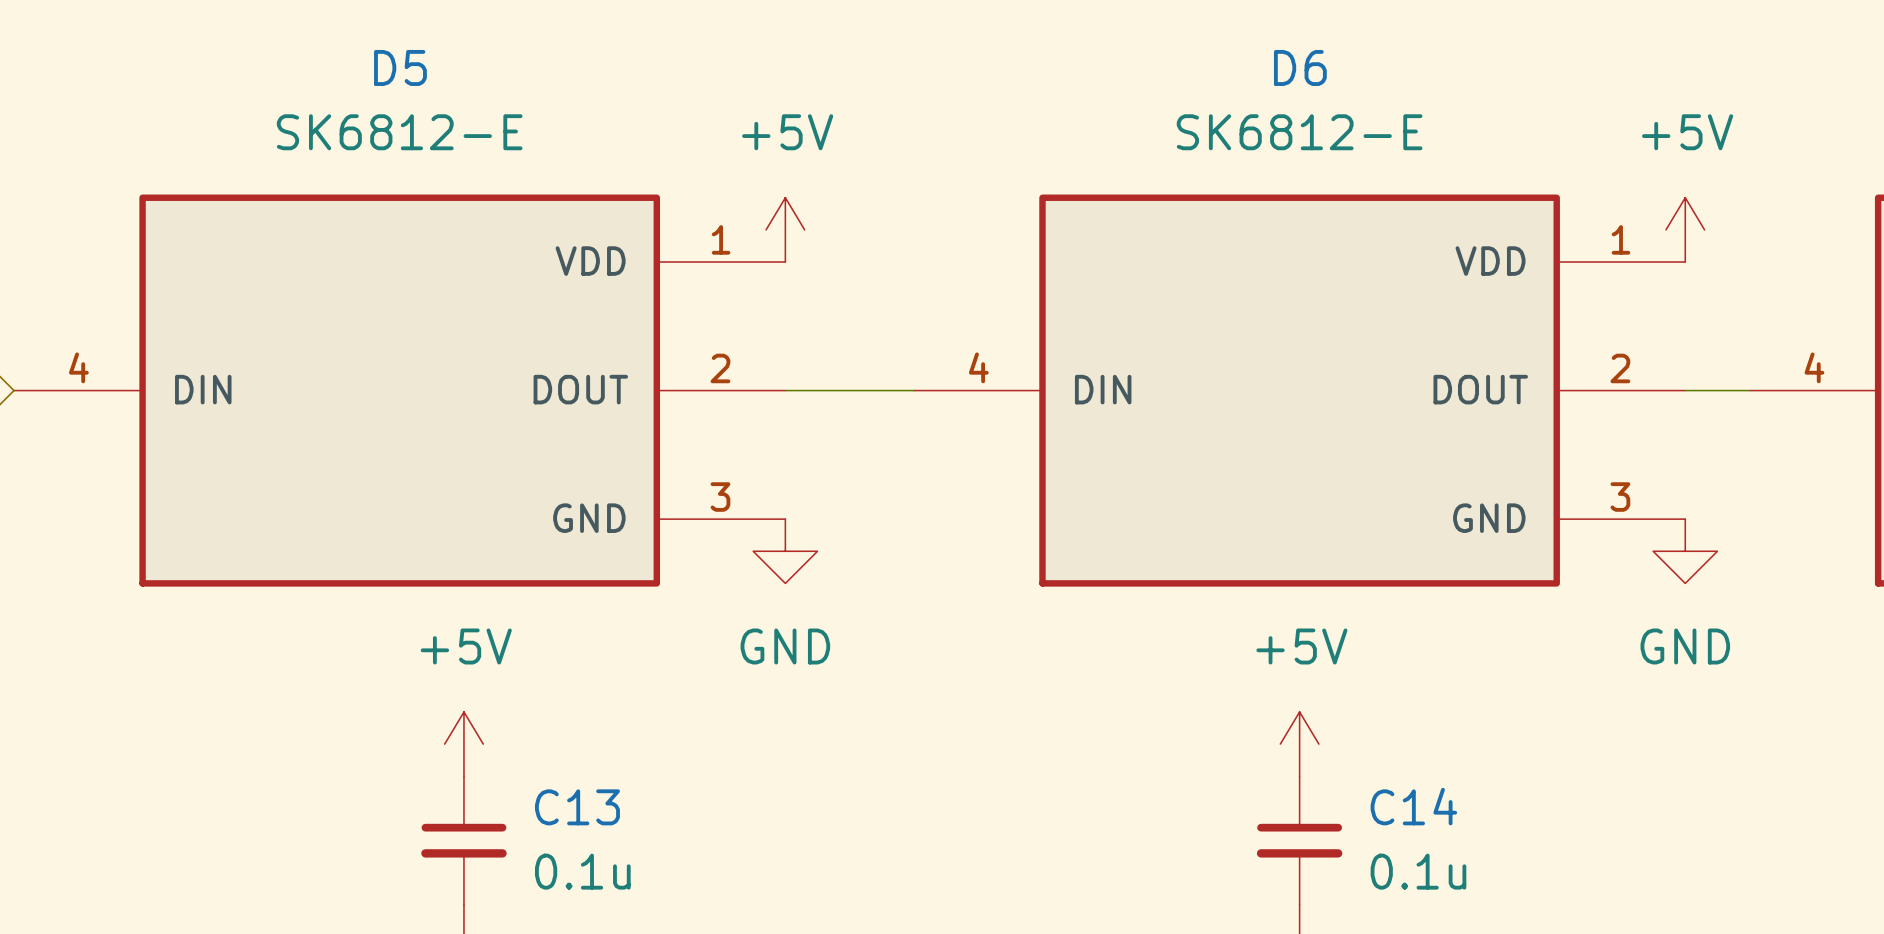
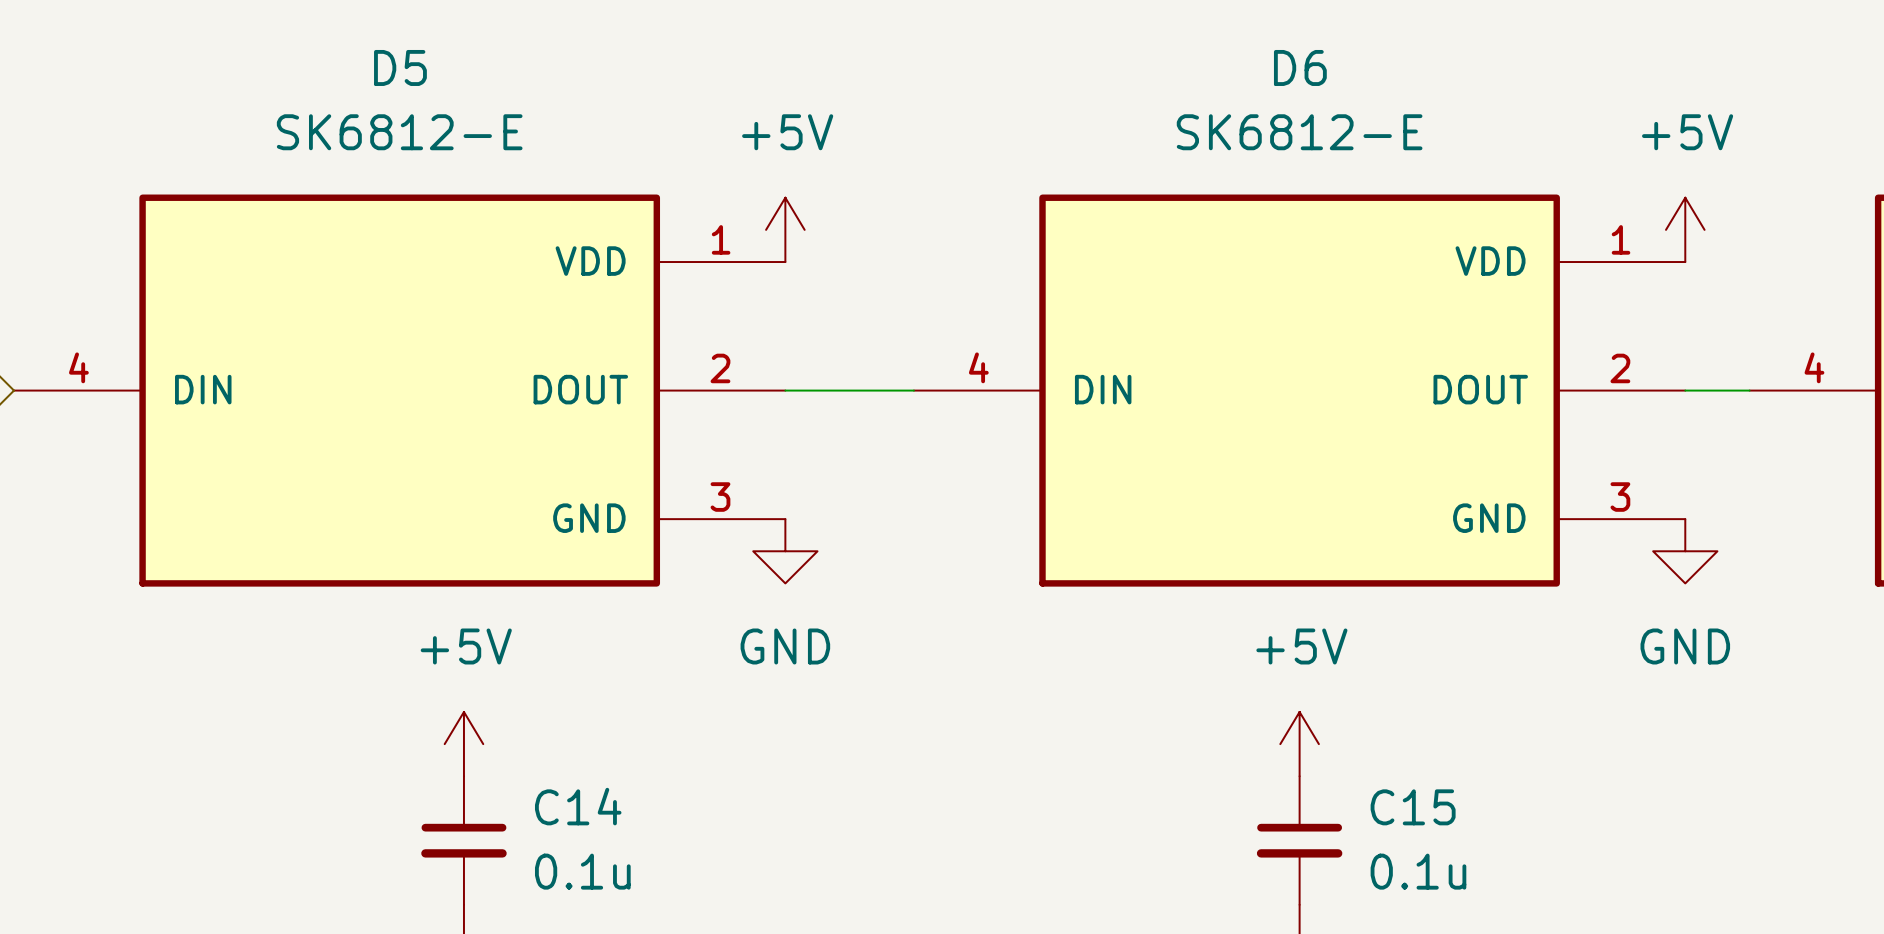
C14 name: C14 (1413, 806) -> C15 (1413, 807)
C13 name: C13 (577, 807) -> C14 (578, 806)

